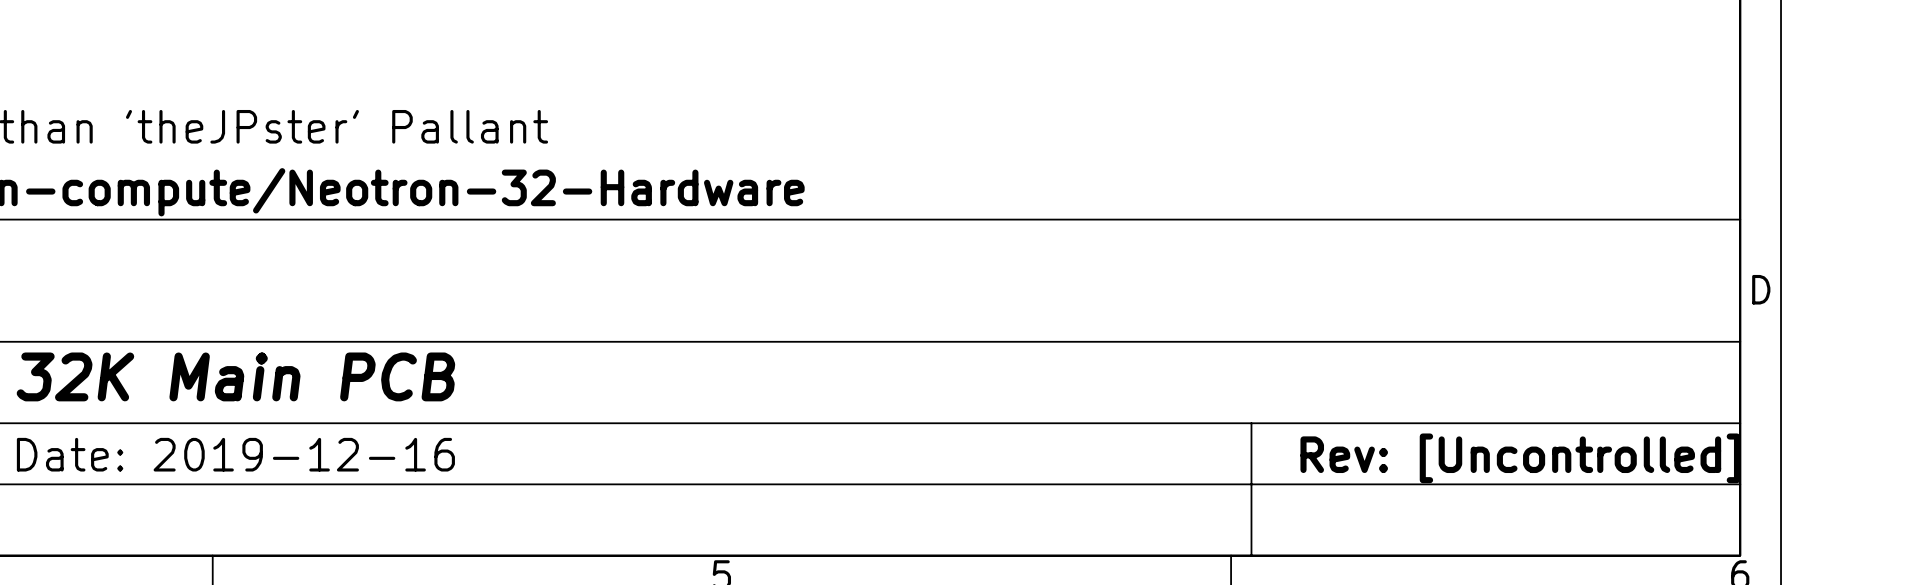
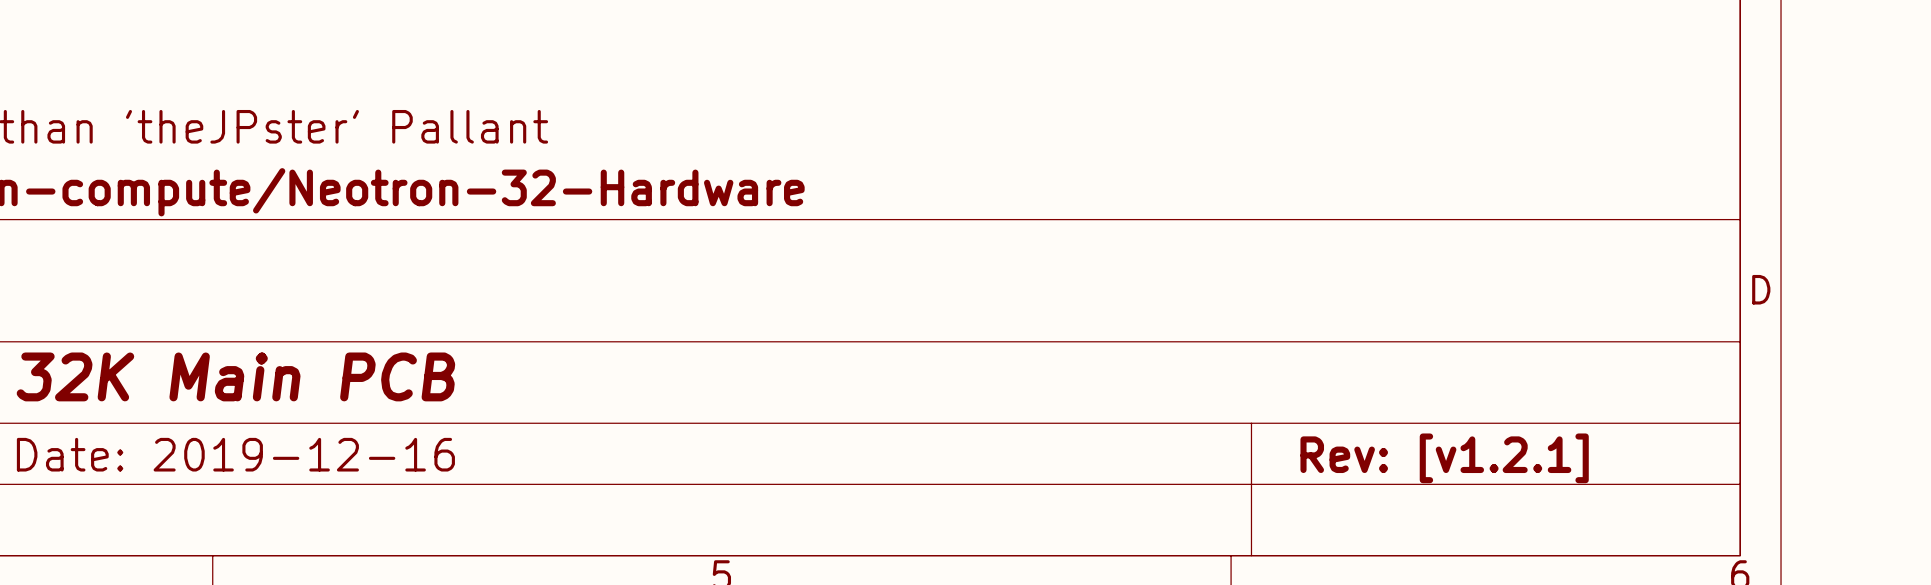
title block: Rev: [Uncontrolled] (1520, 458) -> Rev: [v1.2.1] (1444, 458)

